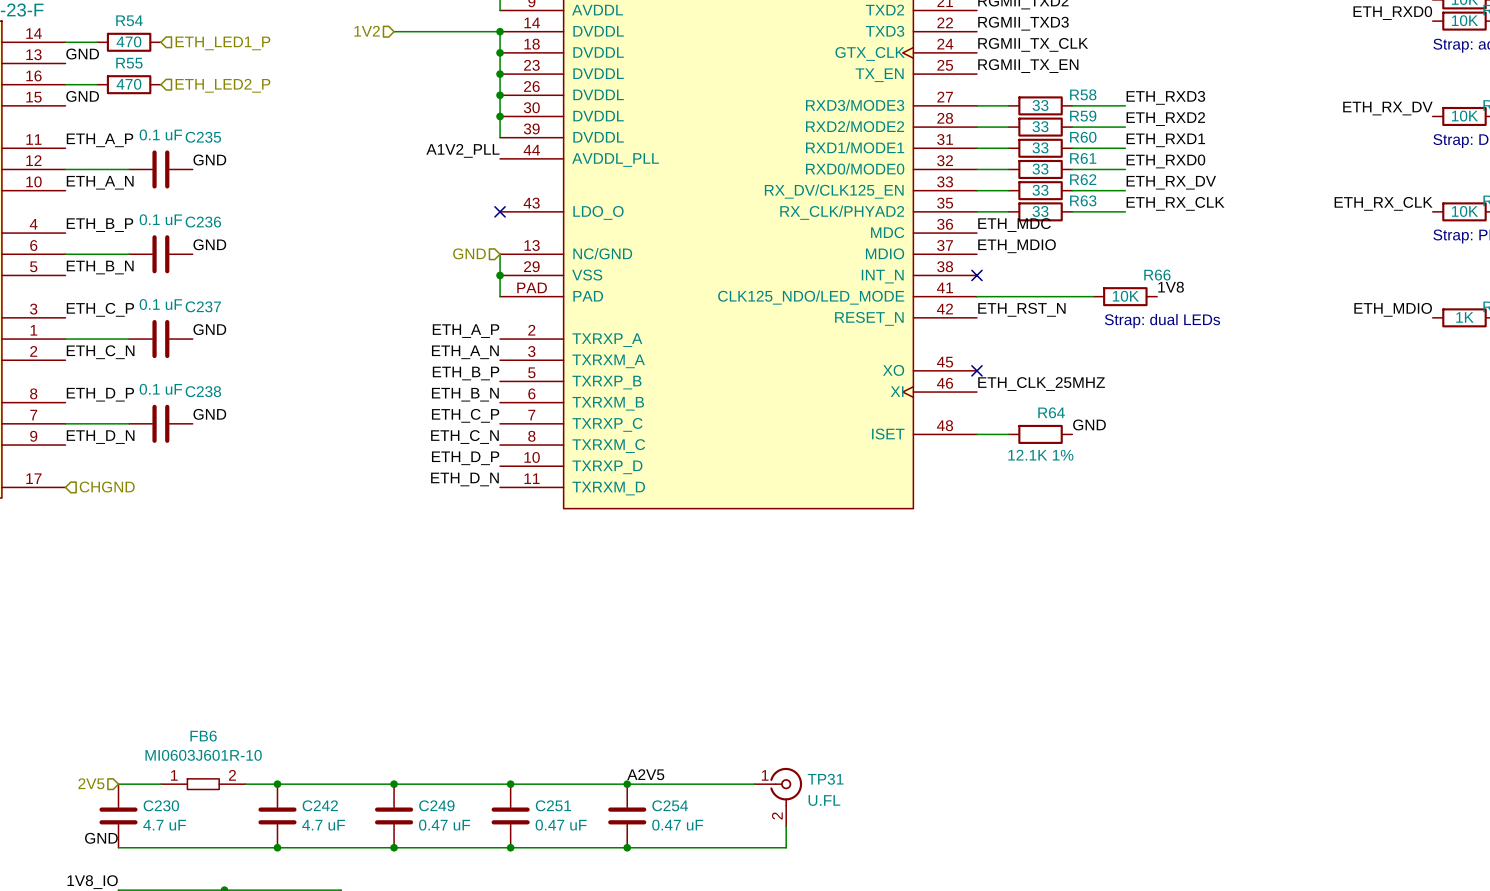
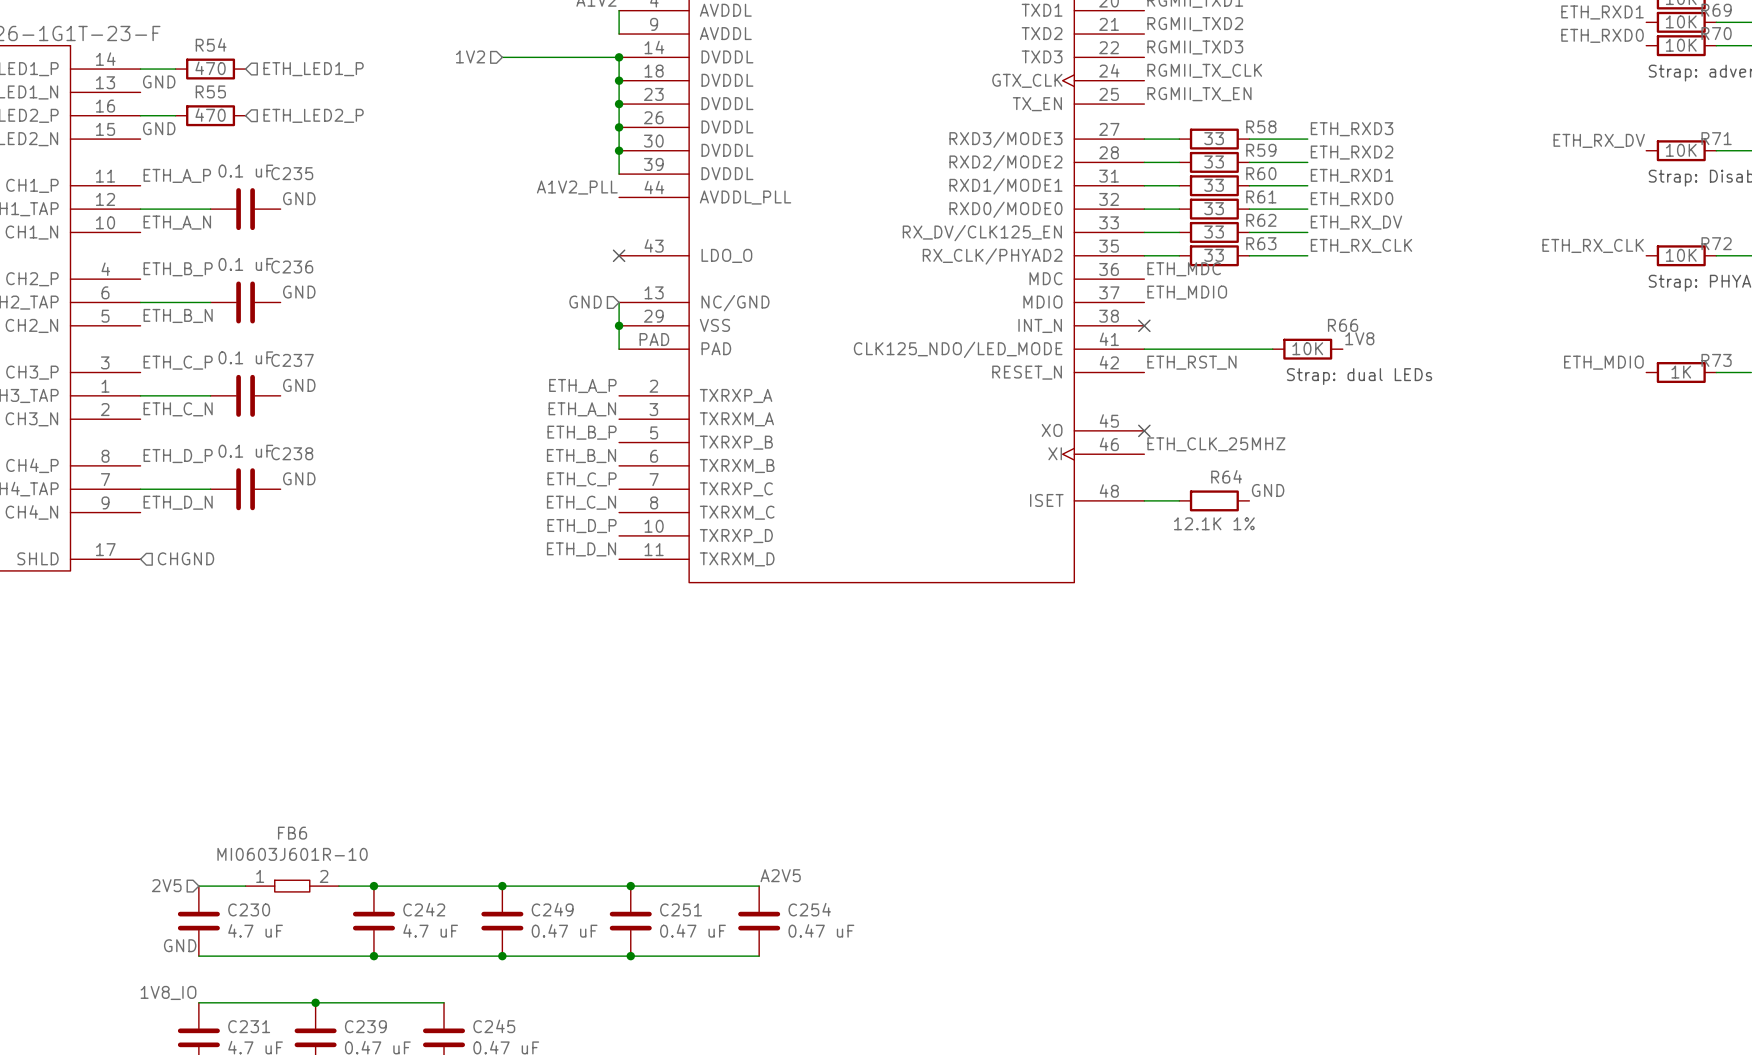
wire: (627, 784) (754, 784) -> none
junction: (627, 784) -> none
TP31: U.FL (778, 797) -> none
wire: (786, 826) (786, 847) (627, 847) -> none
junction: (627, 847) -> none

